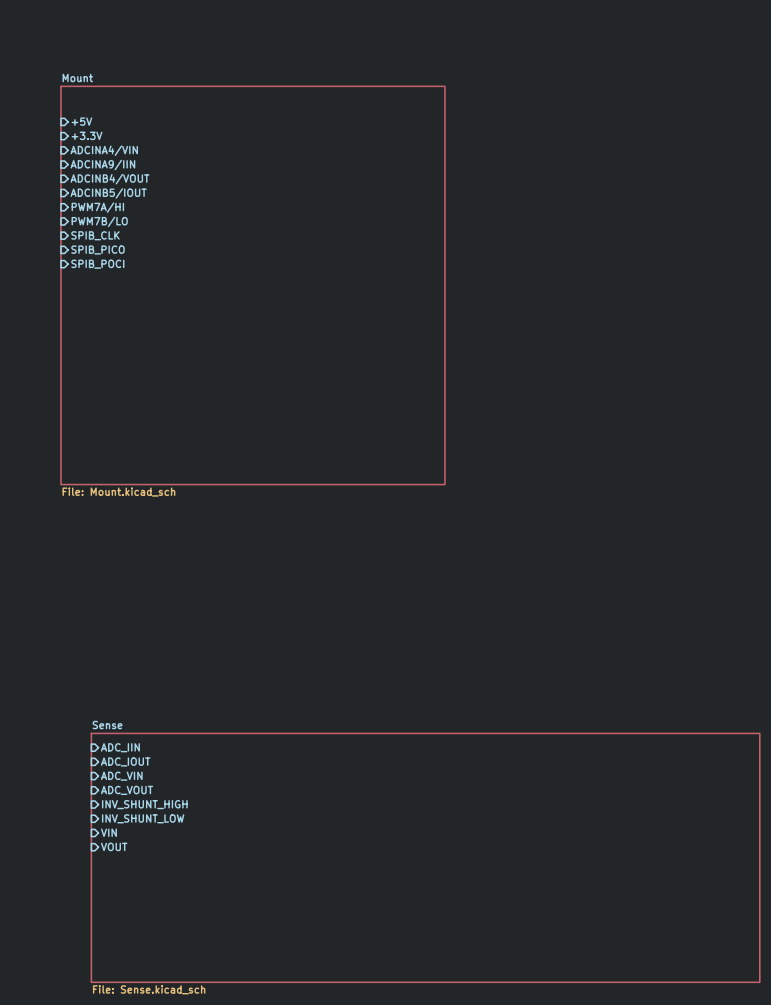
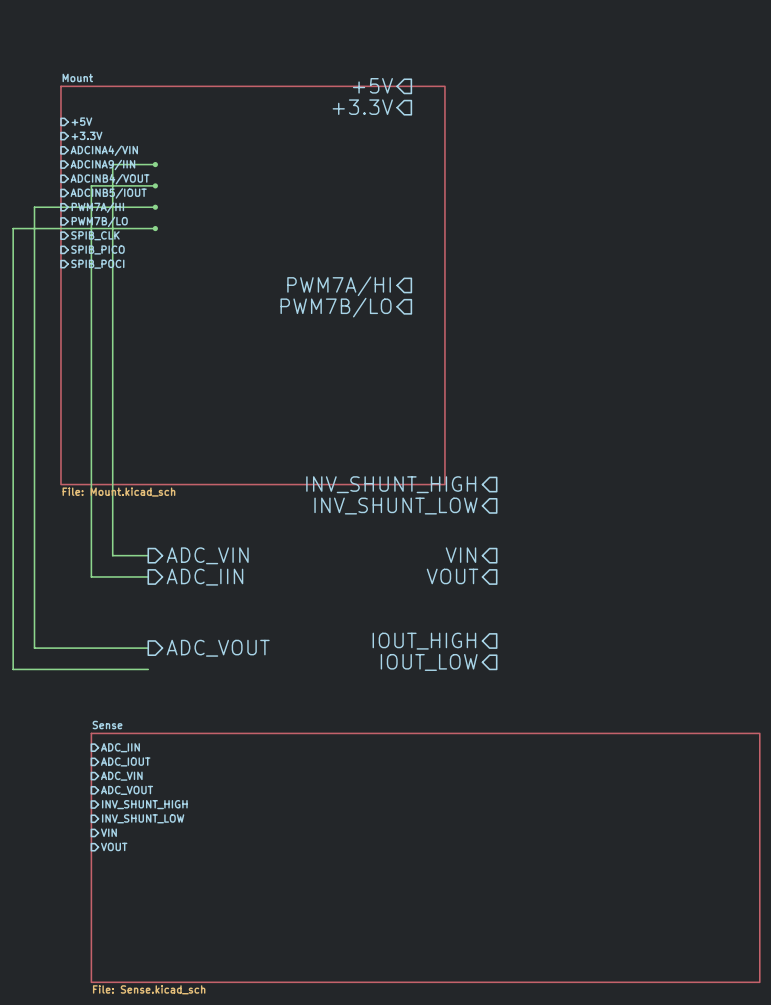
sheet pin: none -> +5V (372, 85)
sheet pin: none -> +3.3V (362, 107)
wire: none -> (155, 164) (112, 164) (112, 555) (148, 555)
junction: none -> (155, 164)
wire: none -> (155, 185) (91, 185) (91, 576) (148, 576)
junction: none -> (155, 185)
wire: none -> (155, 207) (34, 207) (34, 648) (148, 648)
junction: none -> (155, 207)
wire: none -> (155, 228) (13, 228) (13, 669) (148, 669)
junction: none -> (155, 228)
sheet pin: none -> PWM7A/HI (339, 286)
sheet pin: none -> PWM7B/LO (336, 307)
sheet pin: none -> INV_SHUNT_HIGH (391, 484)
sheet pin: none -> INV_SHUNT_LOW (395, 506)
sheet pin: none -> ADC_VIN (207, 555)
sheet pin: none -> VIN (460, 555)
sheet pin: none -> VOUT (452, 576)
sheet pin: none -> ADC_IIN (204, 577)
sheet pin: none -> IOUT_HIGH (424, 641)
sheet pin: none -> ADC_VOUT (218, 648)
sheet pin: none -> IOUT_LOW (429, 662)

